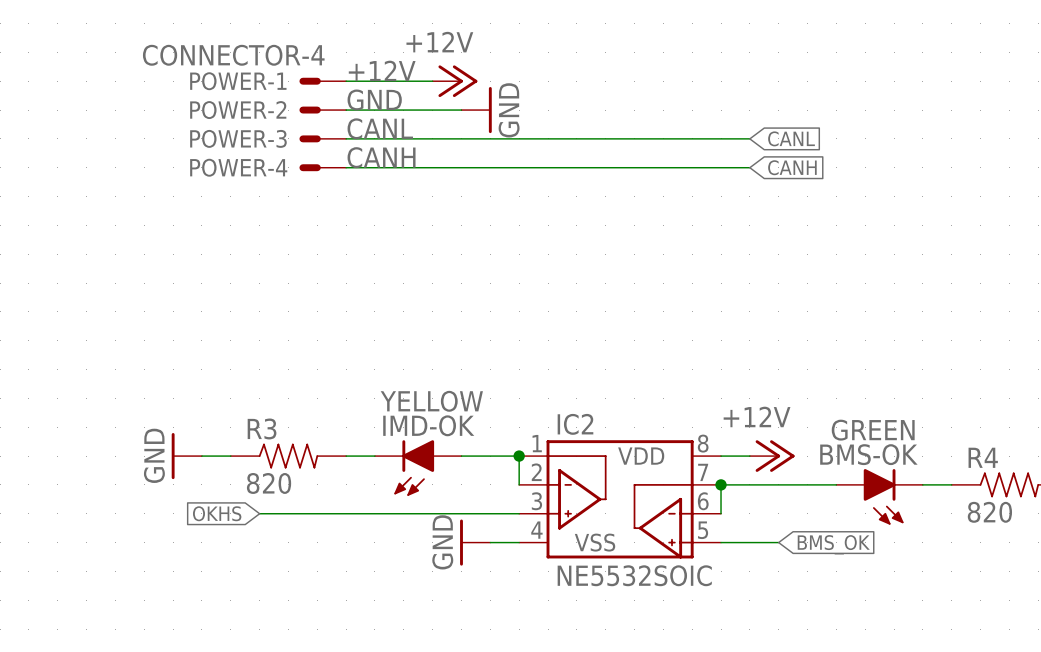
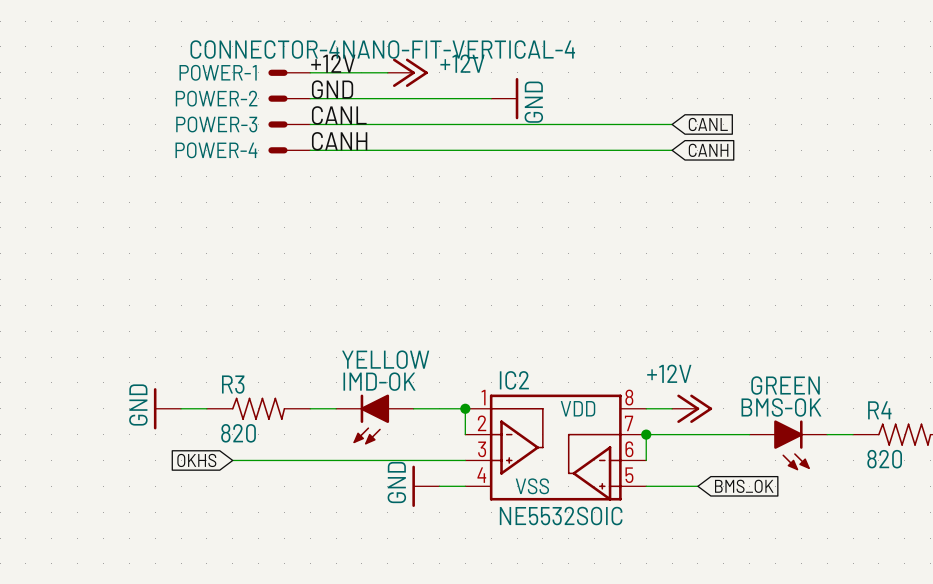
power symbol text position: +12V (439, 42) -> +12V (462, 63)
POWER-1 value: CONNECTOR-4 (233, 55) -> CONNECTOR-4NANO-FIT-VERTICAL-4 (382, 49)
wire: none -> (413, 98) (491, 98)
power symbol position: GND (476, 110) -> GND (504, 98)

